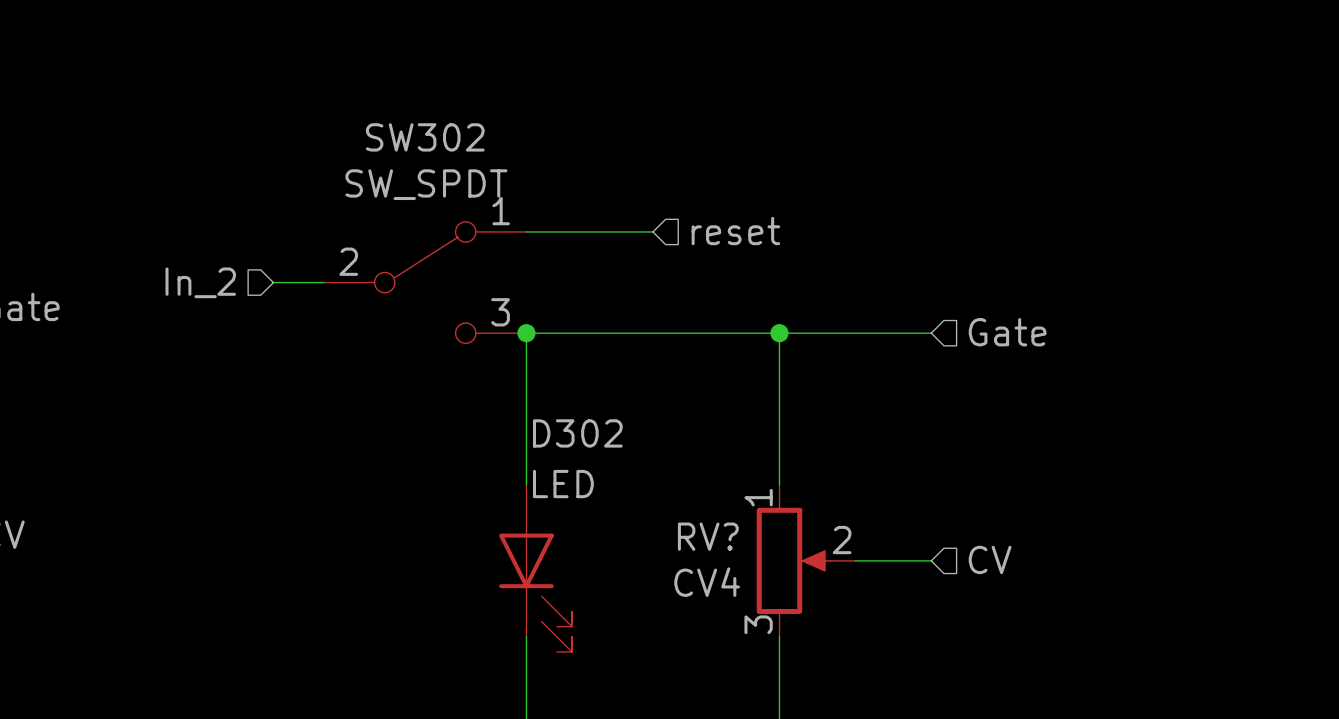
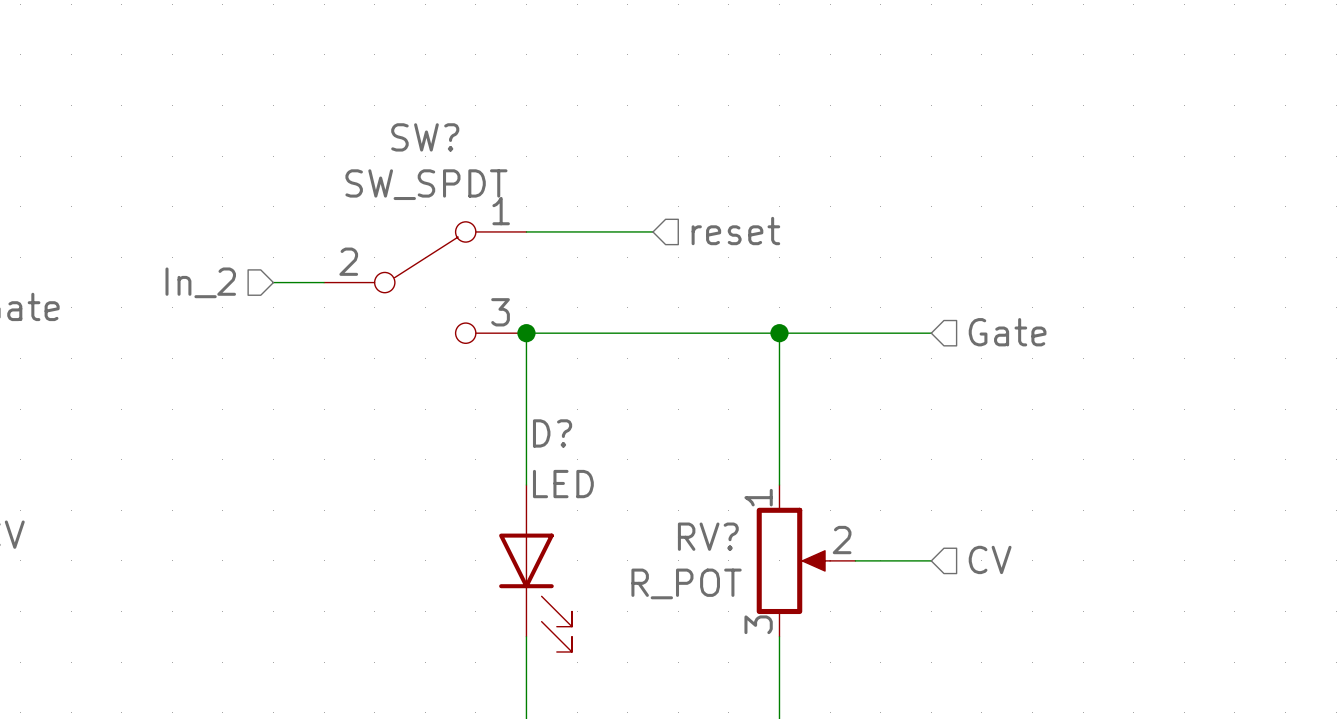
SW302 name: SW302 (425, 137) -> SW? (425, 137)
D302 name: D302 (577, 433) -> D? (552, 433)
RV? value: CV4 (707, 582) -> R_POT (686, 583)

